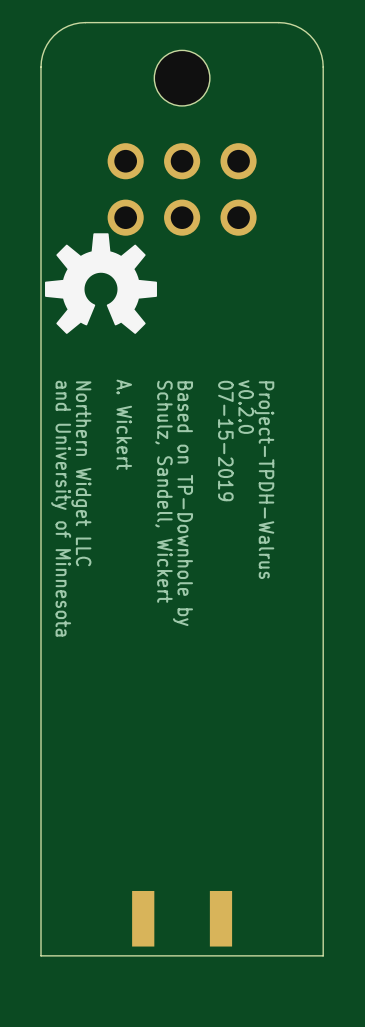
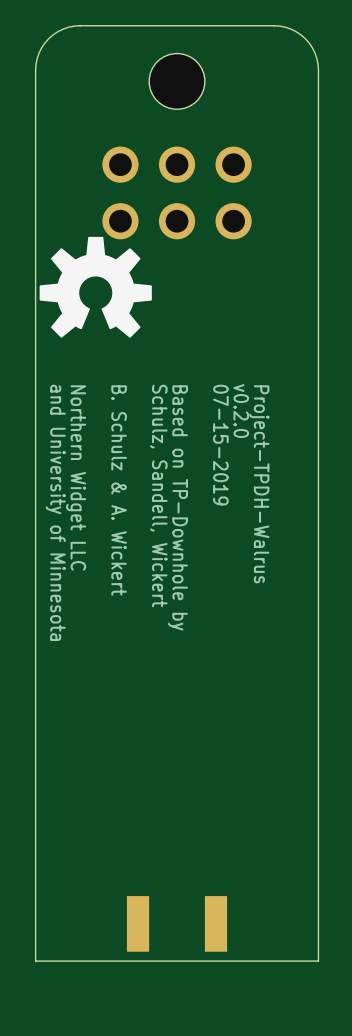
text: A. Wickert (124, 424) -> B. Schulz & A. Wickert (119, 490)

